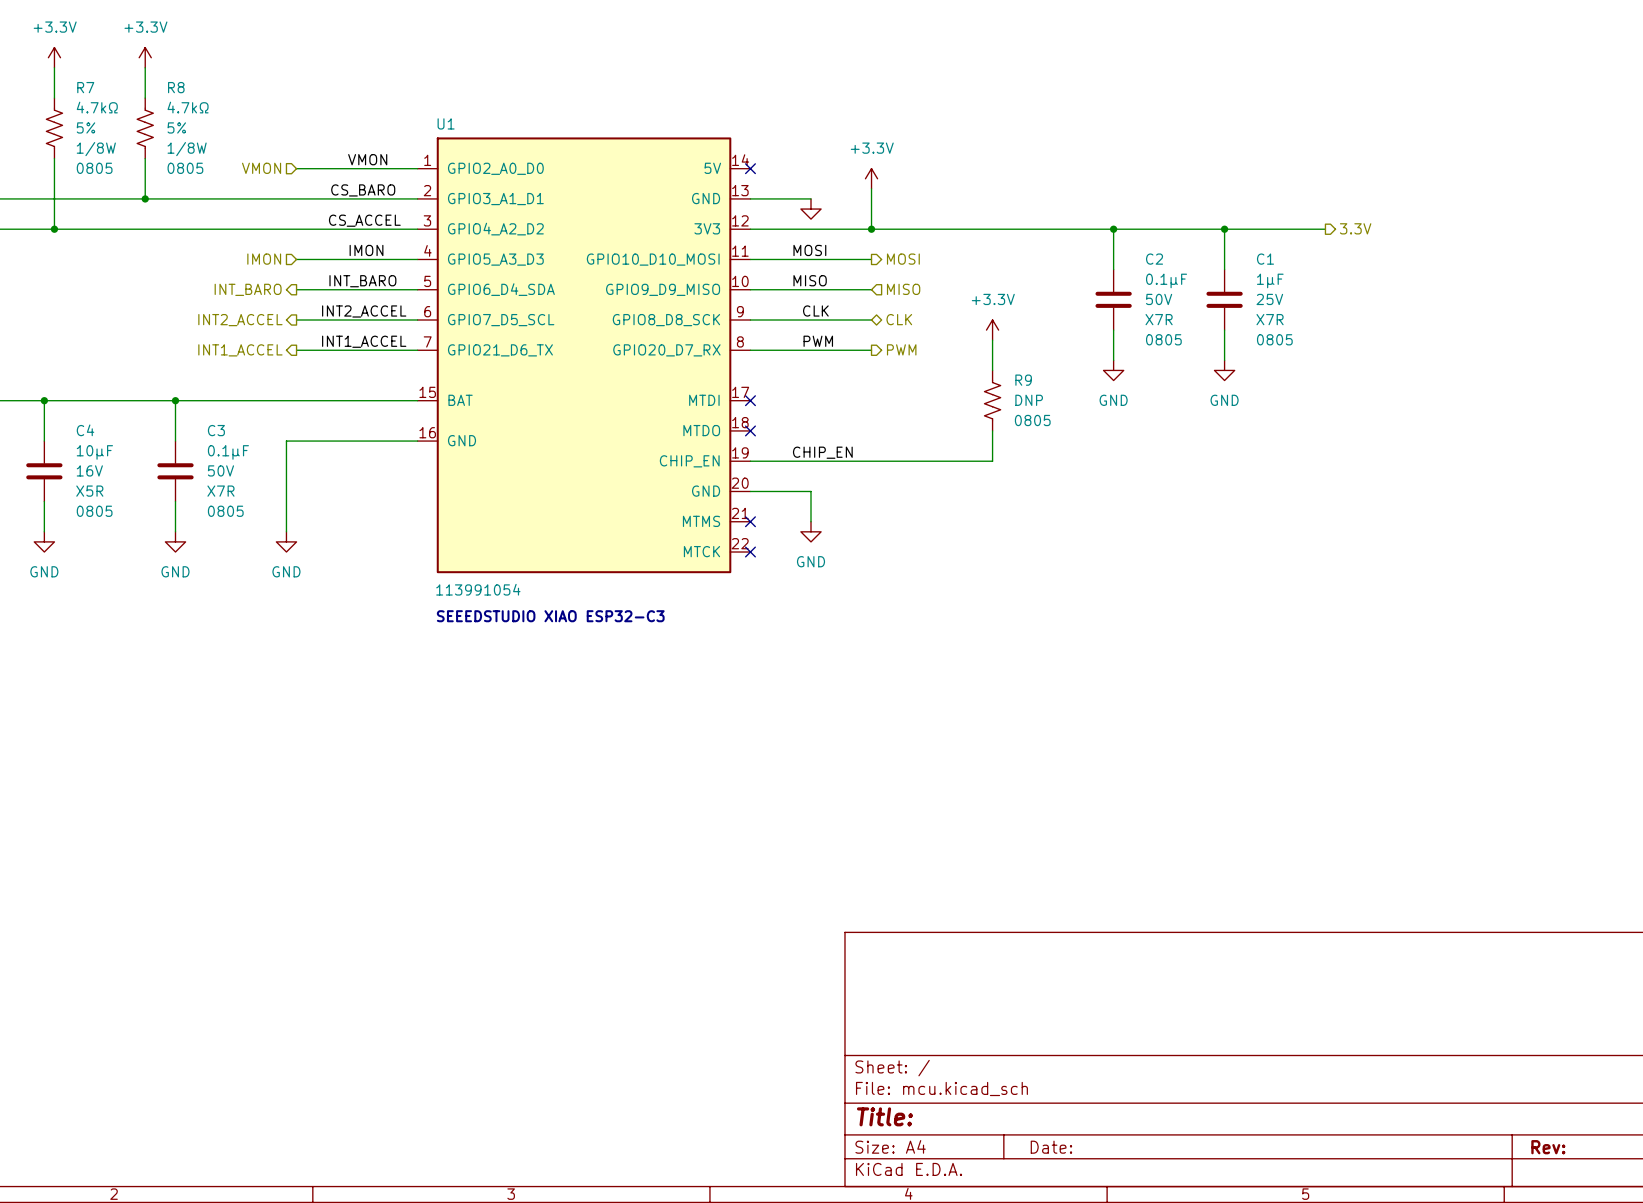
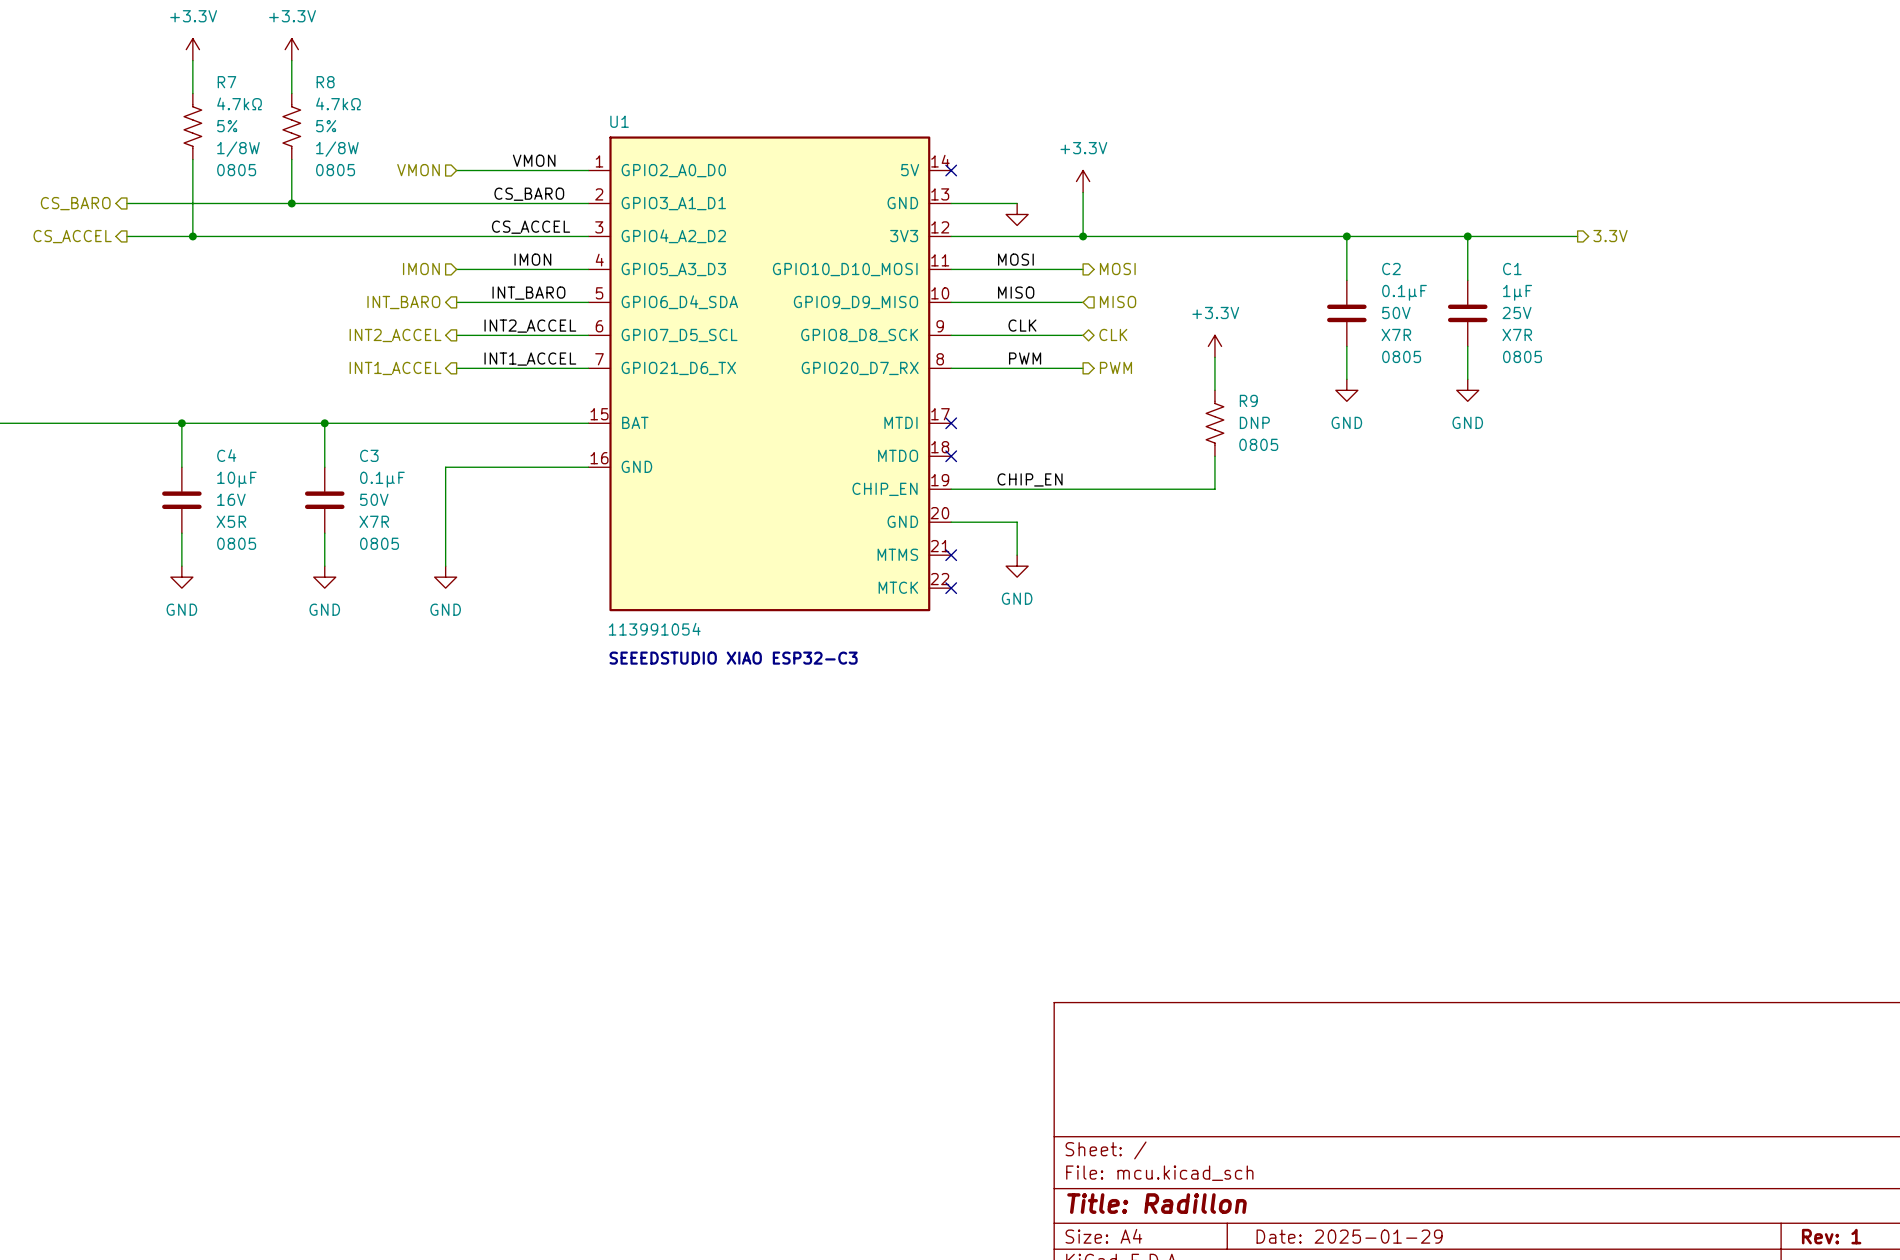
title block: Title: (884, 1116) -> Title: Radillon (1157, 1203)
title block: Date: (1051, 1147) -> Date: 2025-01-29 (1349, 1236)
title block: Rev: (1548, 1147) -> Rev: 1 (1831, 1236)

